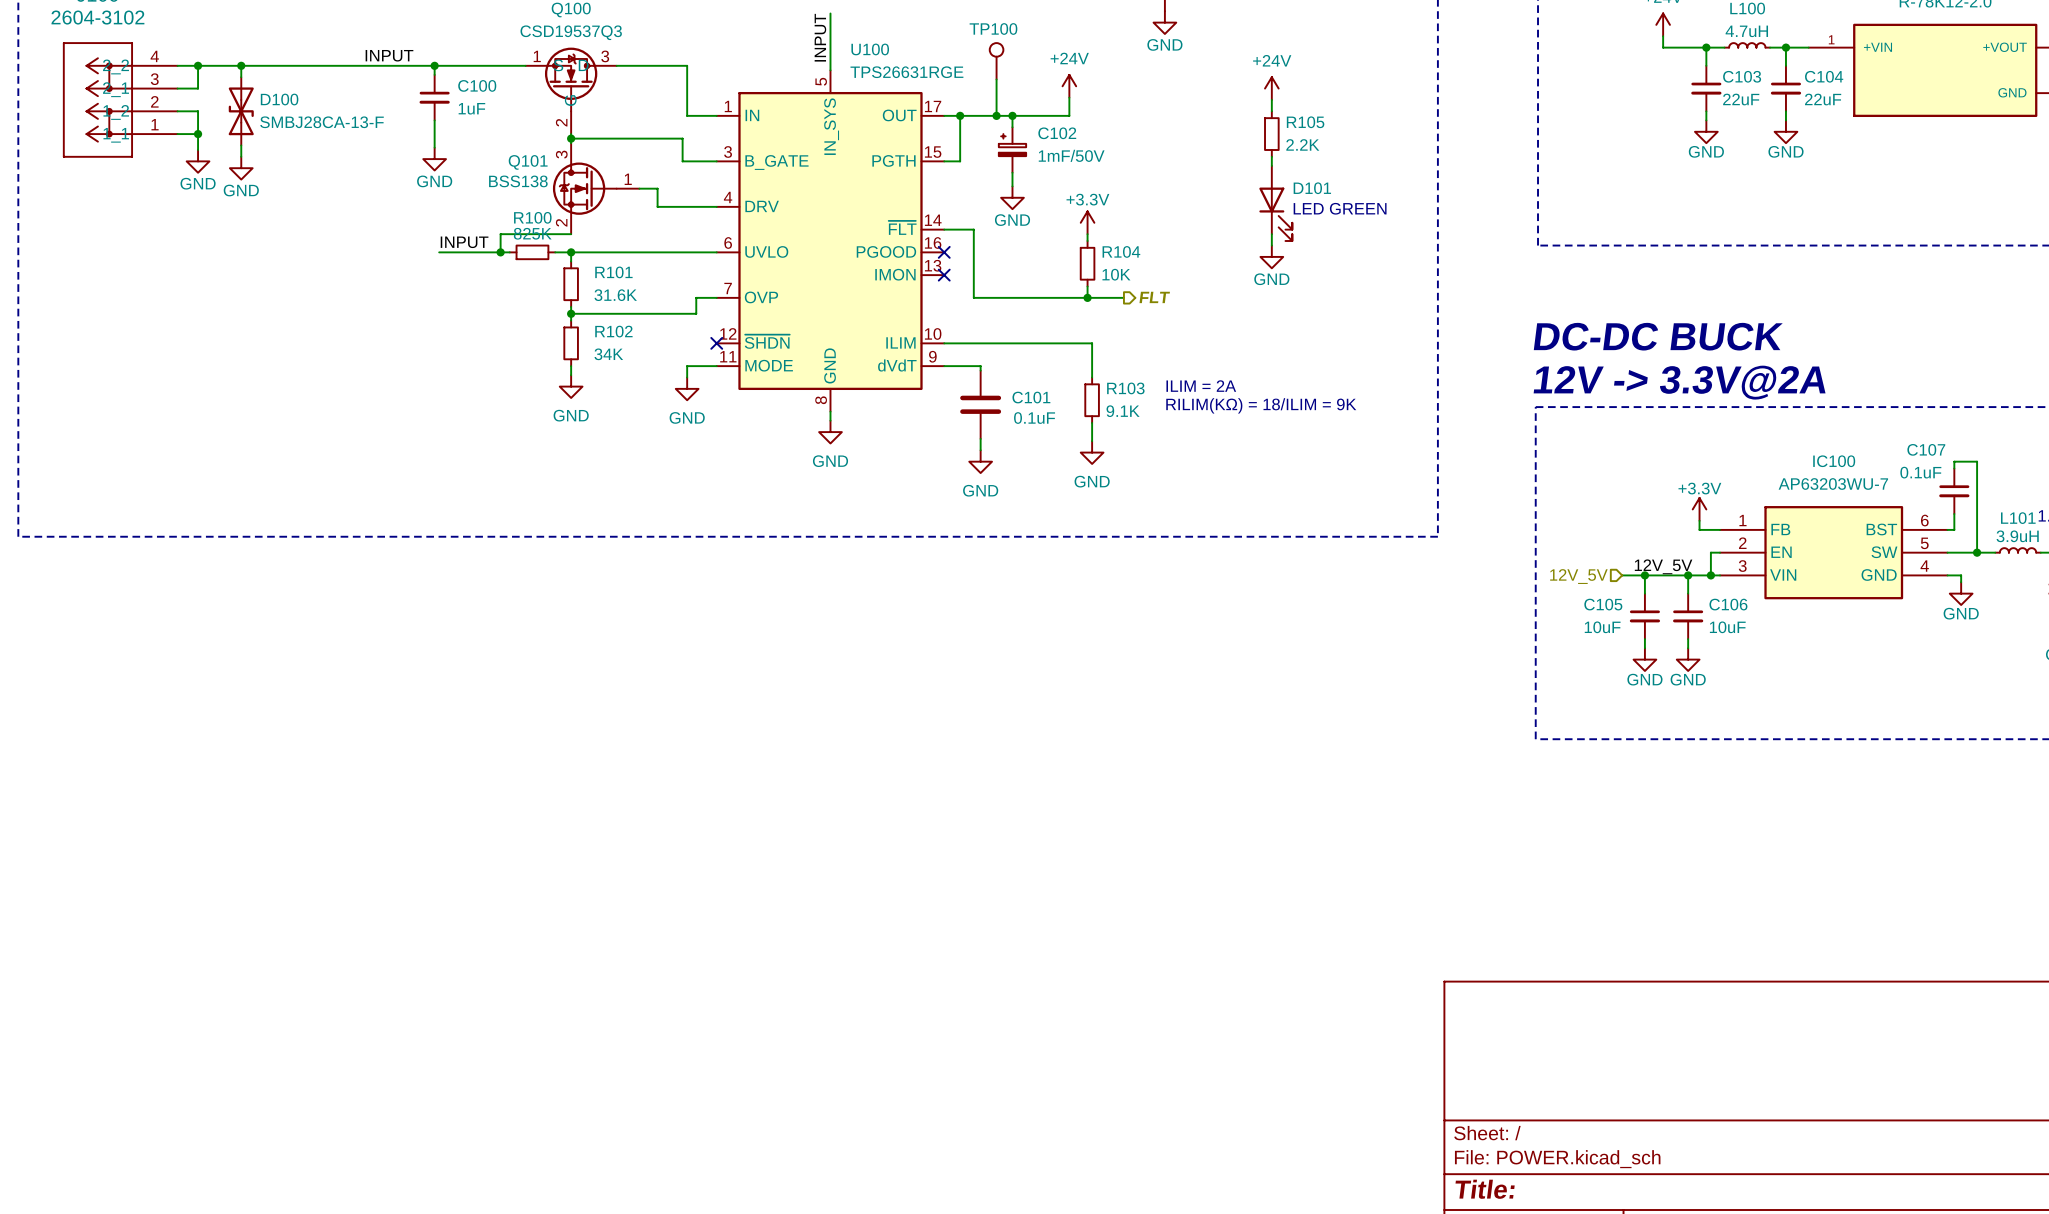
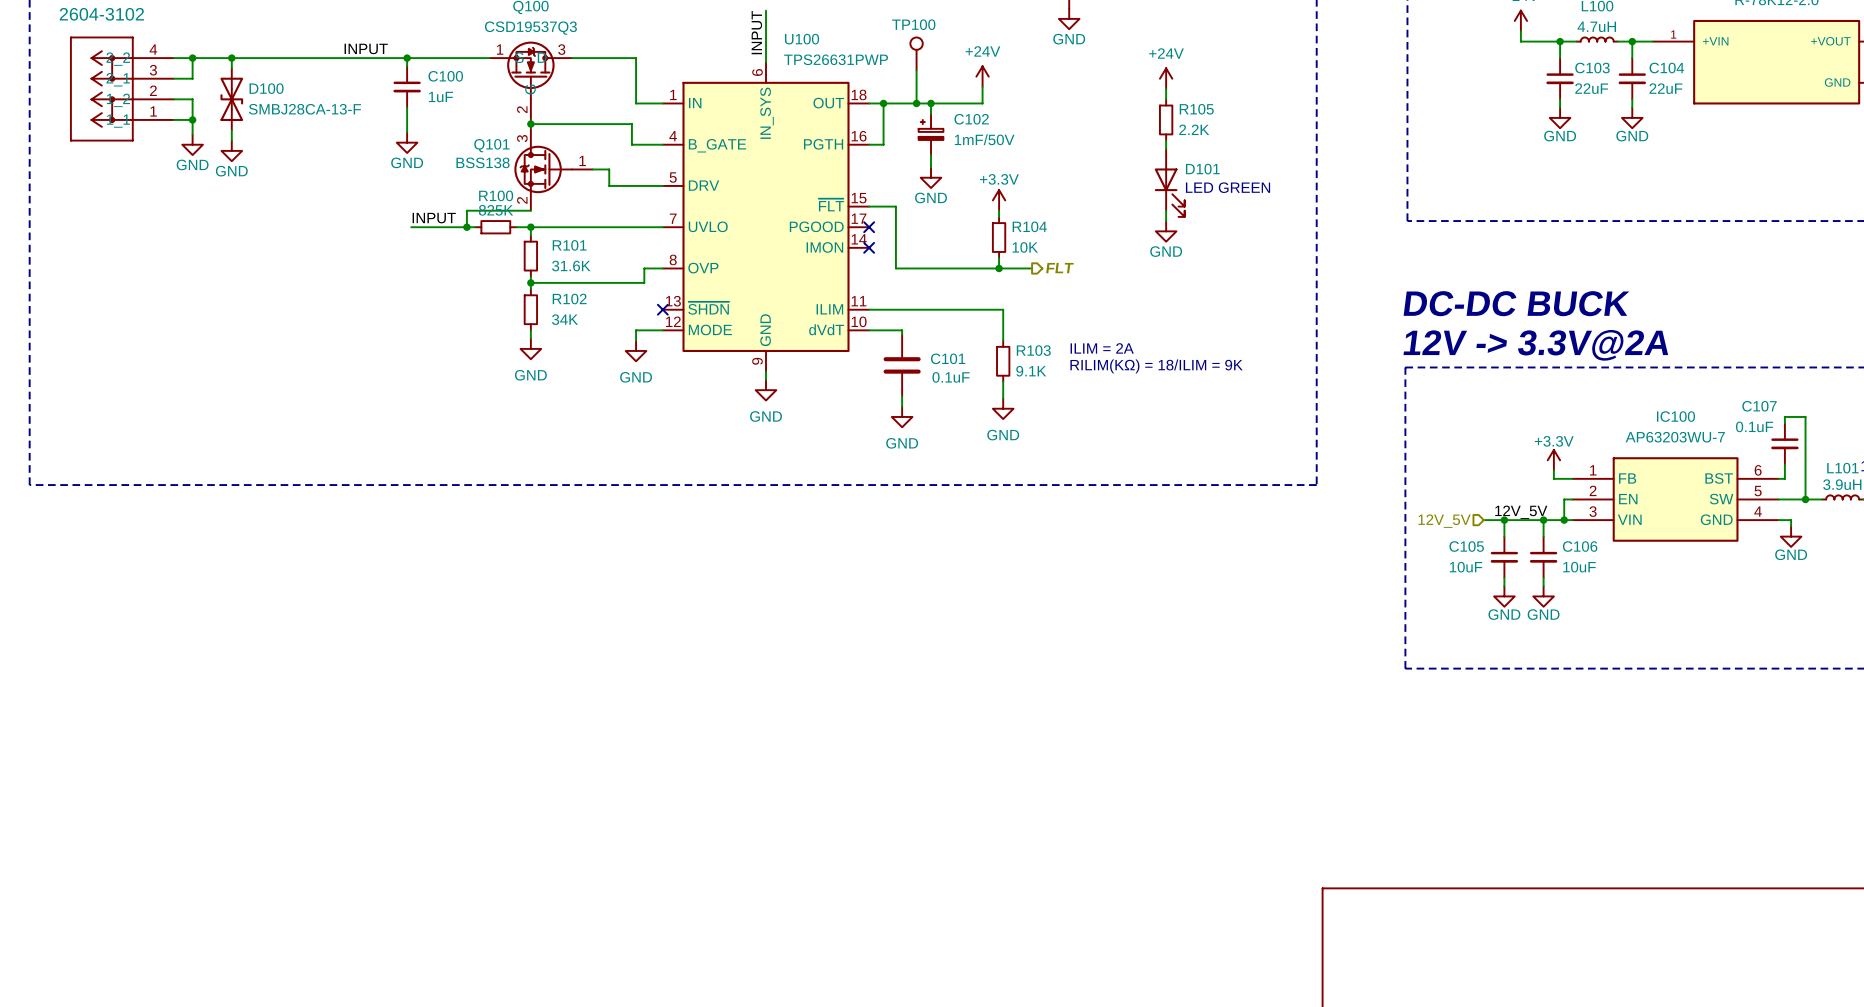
U100 symbol: [716, 70, 945, 412] -> [662, 62, 870, 372]
U100 value: TPS26631RGE (906, 72) -> TPS26631PWP (836, 59)

